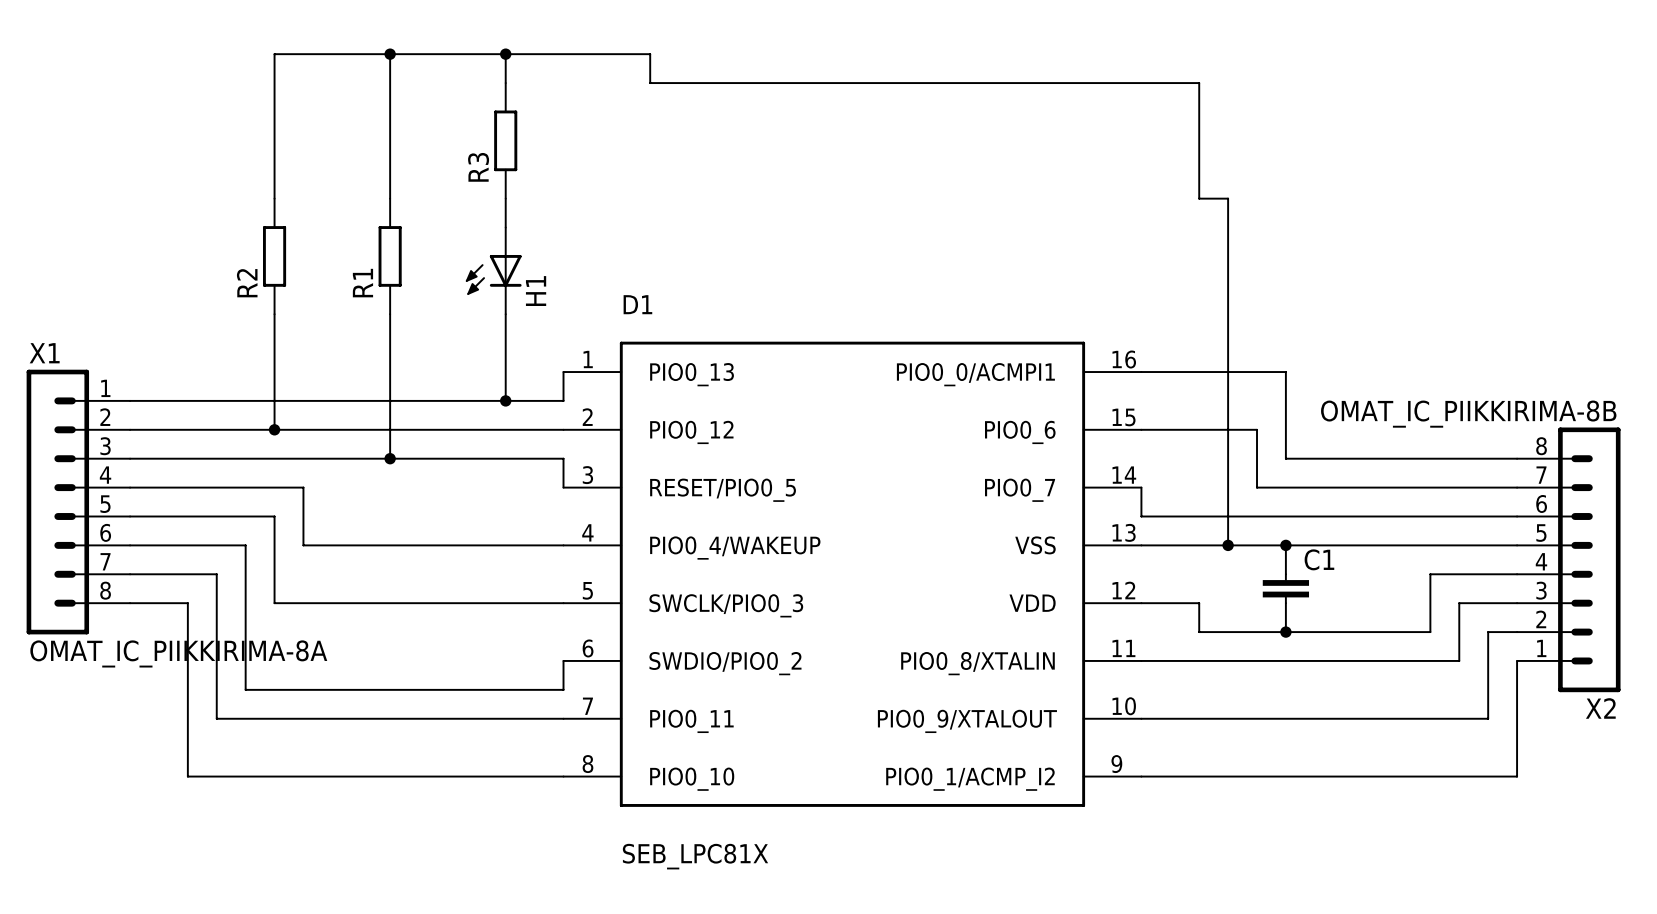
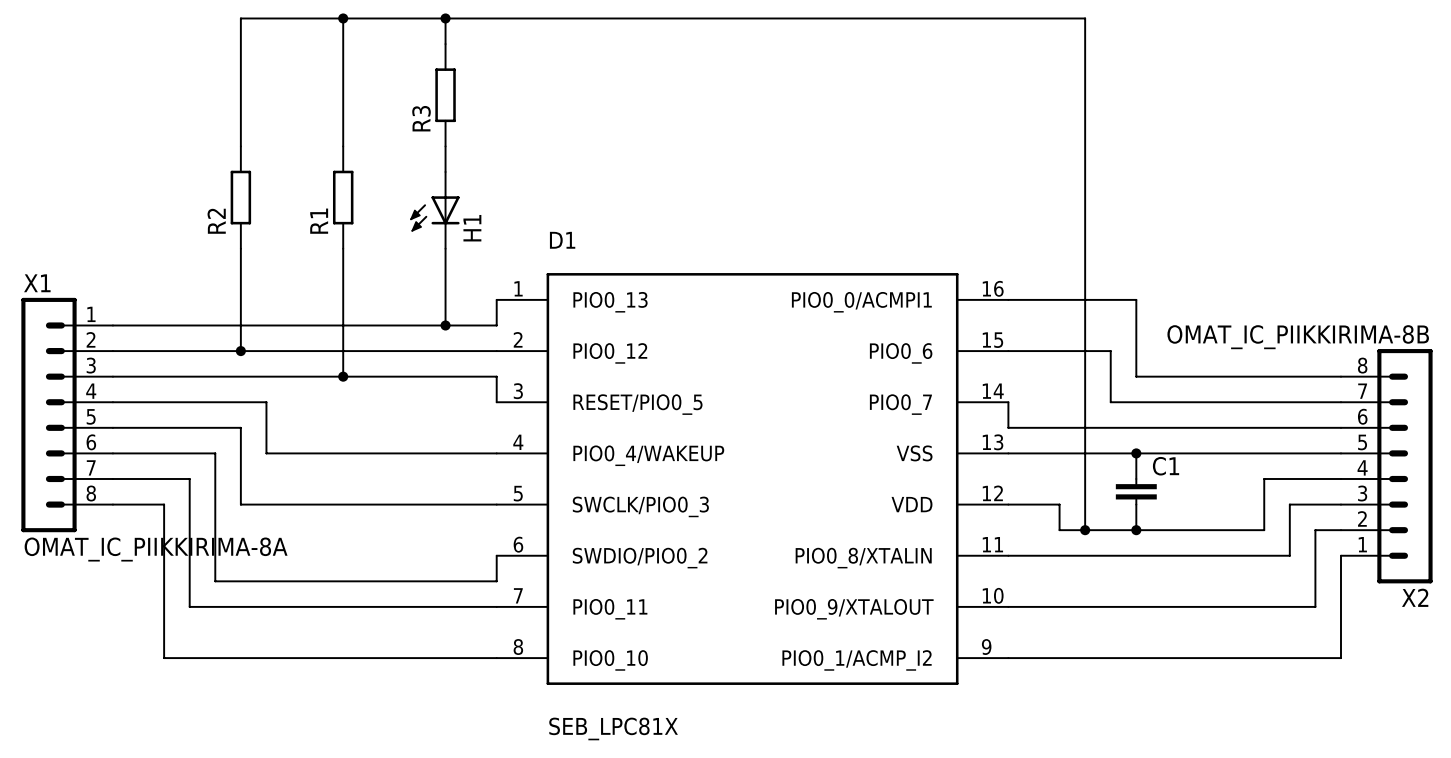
wire: (650, 54) (650, 83) (1199, 83) (1199, 198) (1228, 198) -> (573, 18) (1085, 18) (1085, 146)
wire: none -> (1085, 453) (1085, 530)
junction: (1228, 545) -> none
junction: none -> (1085, 530)

